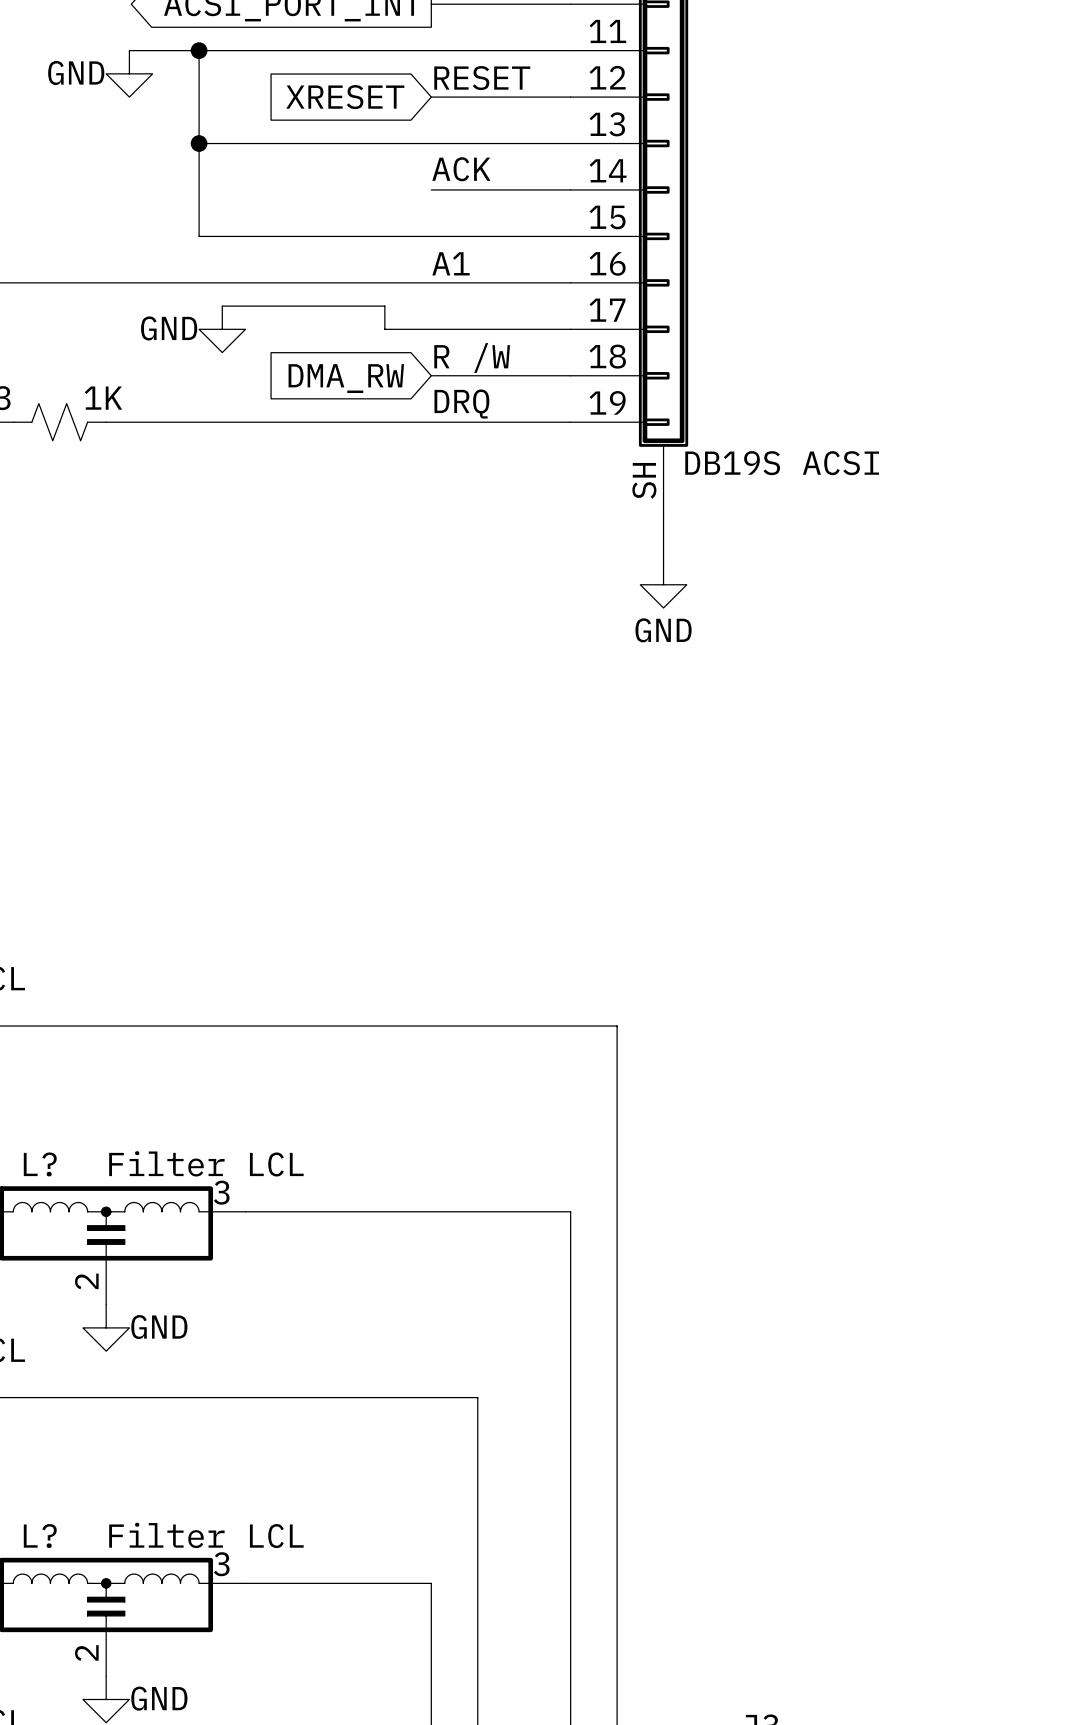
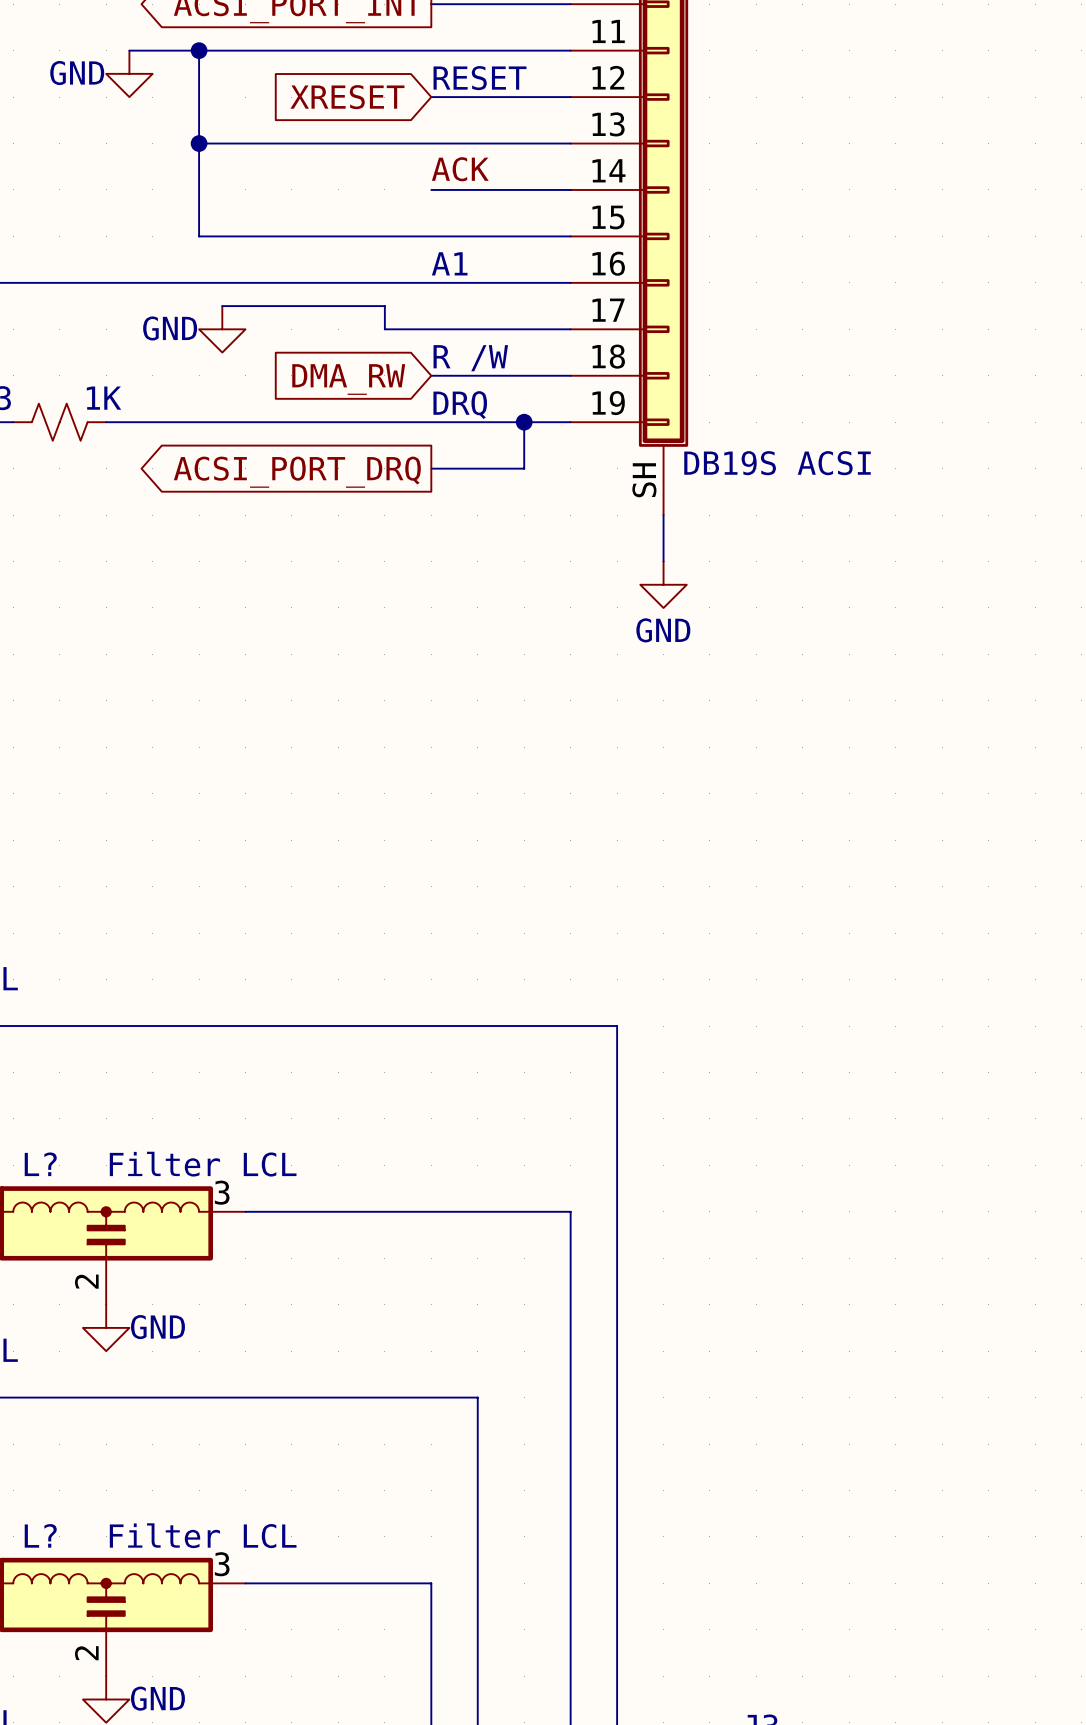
label: DRQ (461, 404) -> none
text: none -> DRQ (460, 405)
wire: none -> (524, 422) (524, 468) (431, 468)
junction: none -> (524, 422)
global label: none -> ACSI_PORT_DRQ (297, 472)

